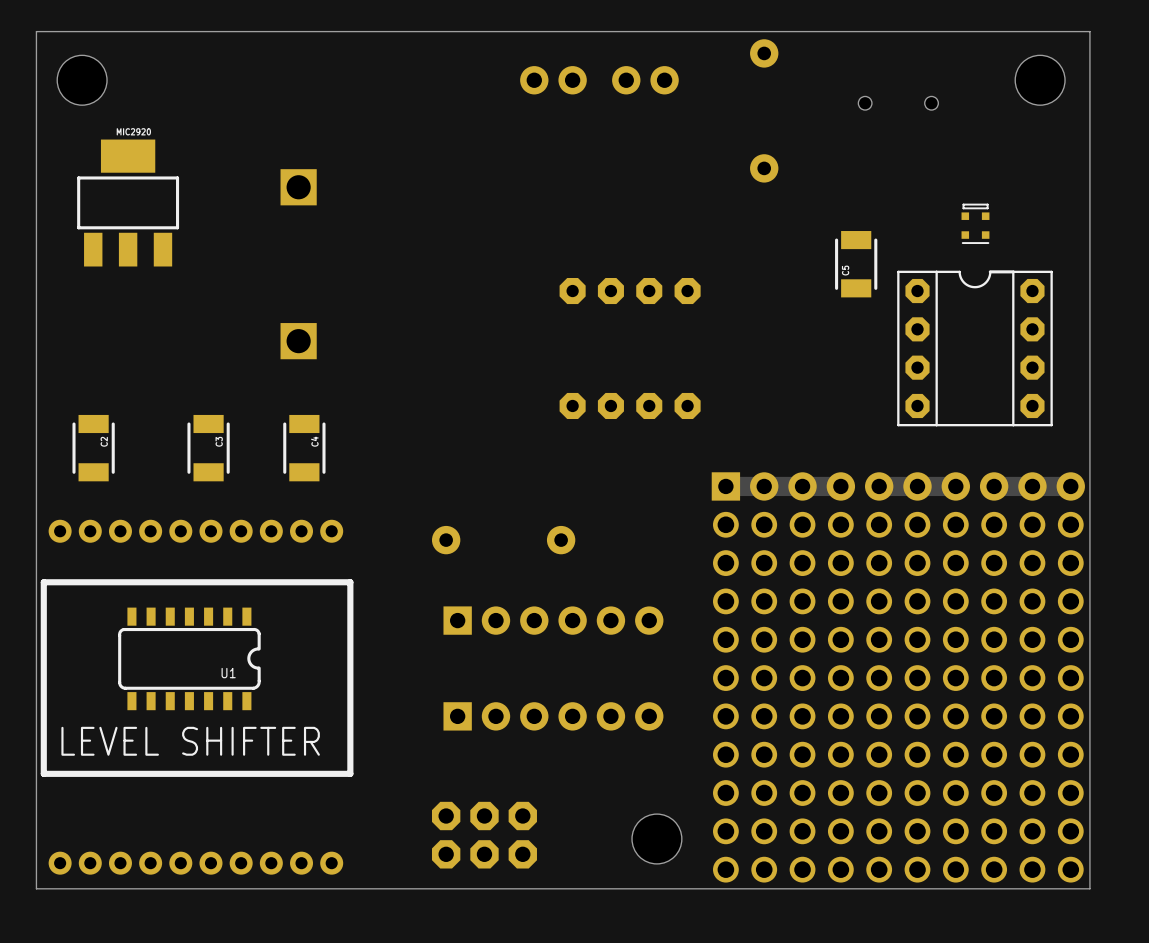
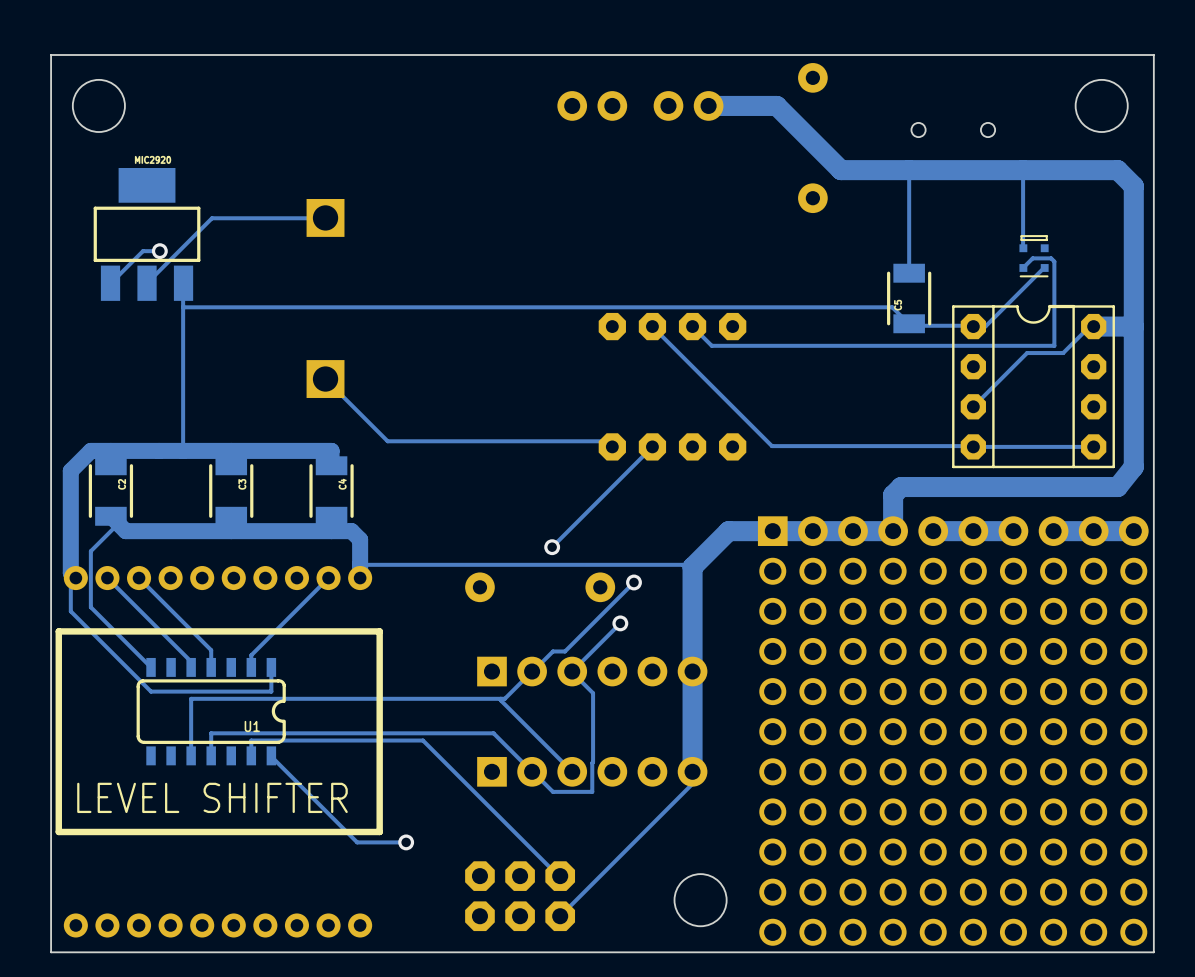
track: none -> (708, 105) (776, 105) (840, 170) (1117, 170) (1133, 186) (1133, 466) (1117, 487) (901, 487) (893, 495) (893, 531)
track: none -> (909, 170) (909, 273)
track: none -> (1023, 170) (1023, 248)
track: none -> (325, 217) (212, 218) (147, 283)
track: none -> (159, 251) (143, 251) (110, 283)
via: none -> (159, 251)
track: none -> (1023, 267) (1032, 258) (1051, 258) (1054, 261) (1054, 345) (711, 345) (692, 326)
track: none -> (1044, 267) (985, 326) (910, 325) (892, 307) (183, 307)
track: none -> (183, 283) (183, 450)
track: none -> (652, 326) (771, 446) (1093, 446)
track: none -> (1133, 326) (1093, 326) (1084, 331) (1063, 353) (1027, 353) (973, 406)
track: none -> (325, 379) (387, 441) (606, 441) (613, 447)
track: none -> (652, 446) (552, 547)
track: none -> (331, 465) (331, 450) (90, 450) (70, 470) (70, 572) (75, 578) (70, 583) (70, 611) (151, 691) (271, 691) (271, 667)
track: none -> (110, 516) (125, 531) (351, 531) (360, 539) (360, 578)
track: none -> (118, 523) (90, 551) (90, 607) (151, 667)
track: none -> (772, 531) (728, 531) (692, 567)
via: none -> (552, 547)
track: none -> (360, 564) (682, 564) (692, 567)
track: none -> (692, 567) (692, 771) (694, 781) (560, 916)
track: none -> (107, 578) (191, 661) (191, 667)
track: none -> (139, 578) (211, 650) (211, 667)
track: none -> (328, 578) (251, 655) (251, 667)
track: none -> (633, 582) (565, 651) (552, 651) (504, 698) (191, 698) (191, 755)
via: none -> (633, 582)
track: none -> (620, 623) (572, 671) (593, 693) (592, 791) (552, 791) (493, 733) (211, 733) (211, 755)
via: none -> (620, 623)
track: none -> (500, 698) (572, 771)
track: none -> (251, 755) (251, 740) (423, 740) (560, 876)
track: none -> (271, 755) (357, 842) (406, 842)
via: none -> (406, 842)

